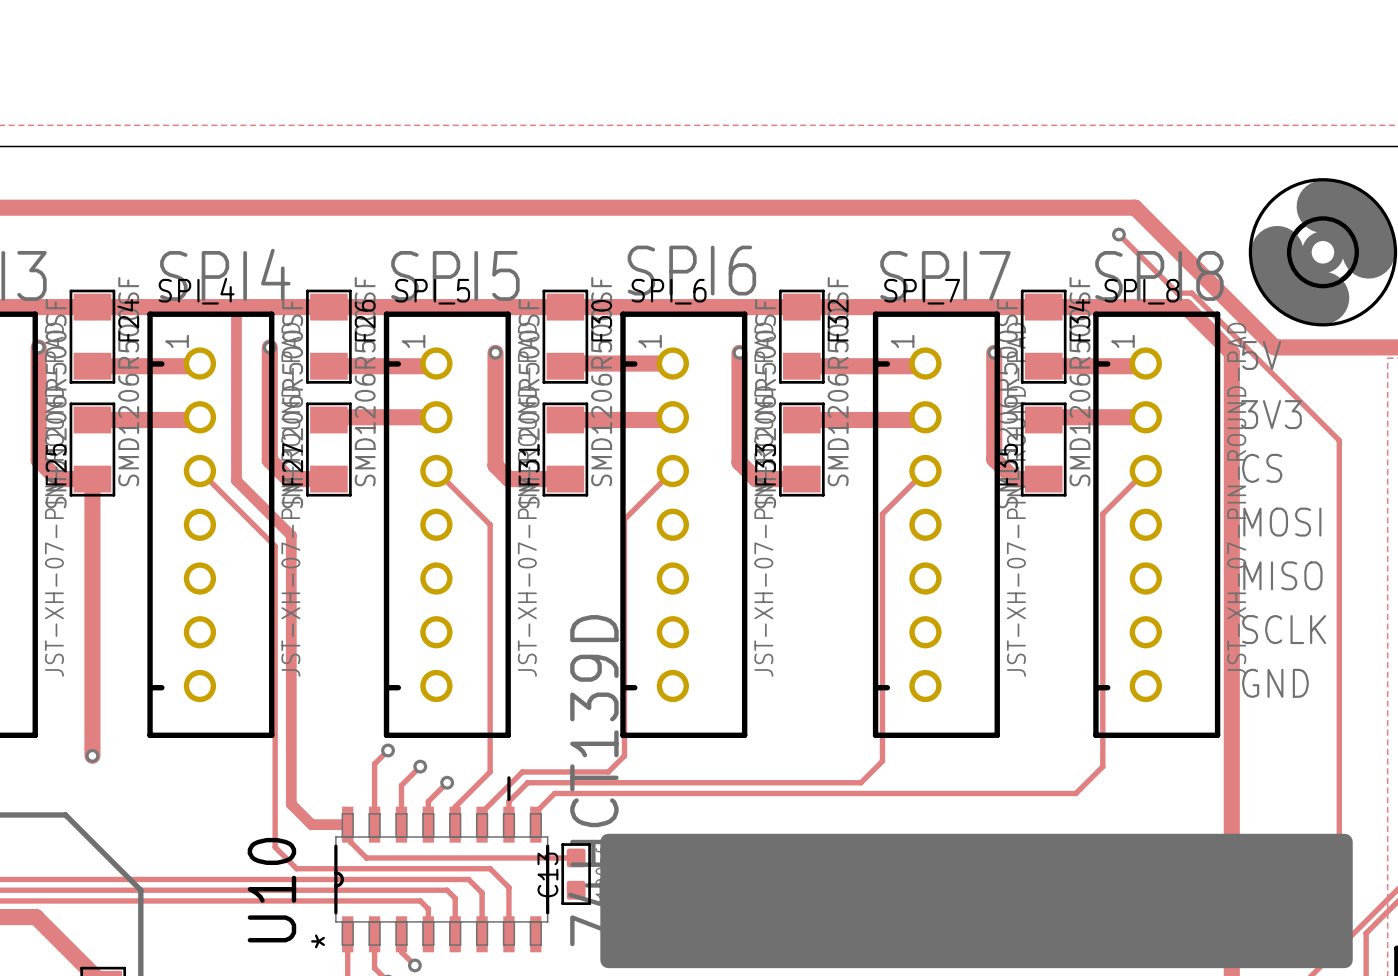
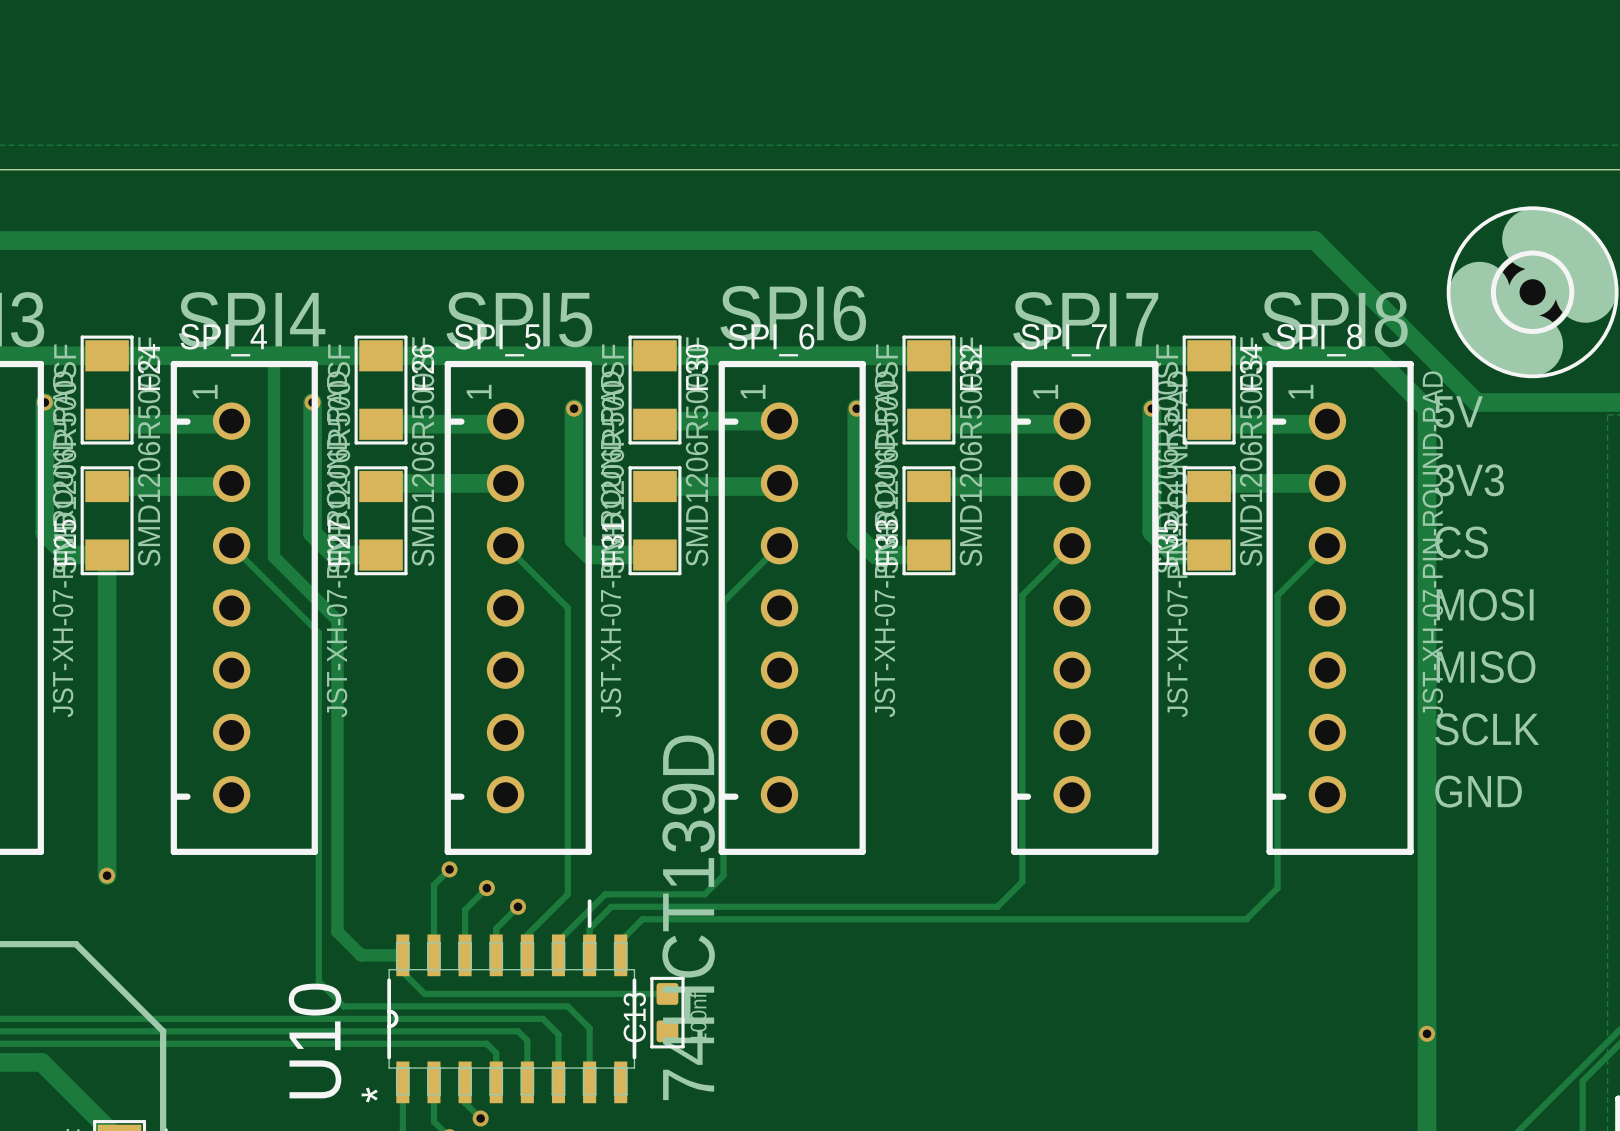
track: (1118, 234) (1177, 293) (1191, 293) (1339, 440) (1339, 917) -> none
via: (1118, 234) -> none
drawing: [600, 833, 1353, 969] -> none

